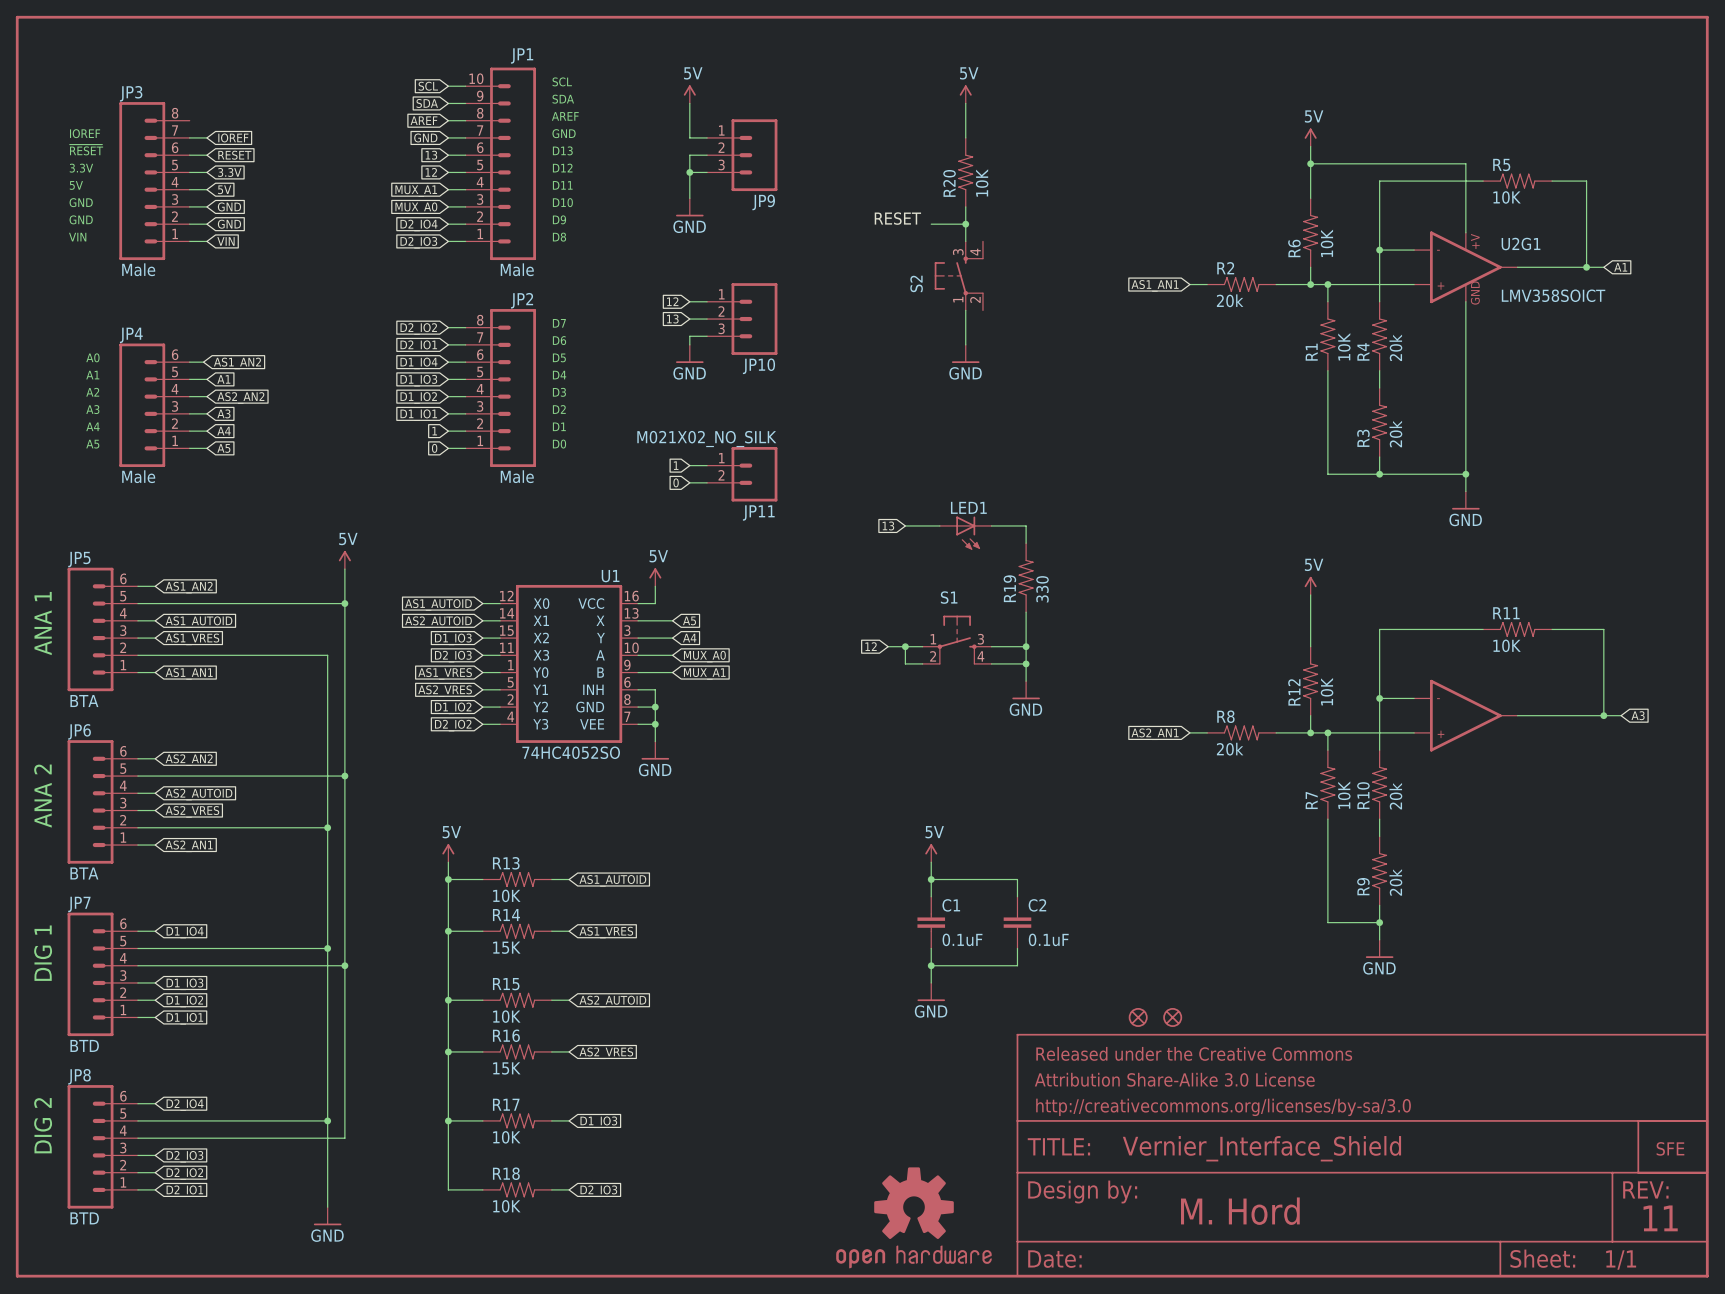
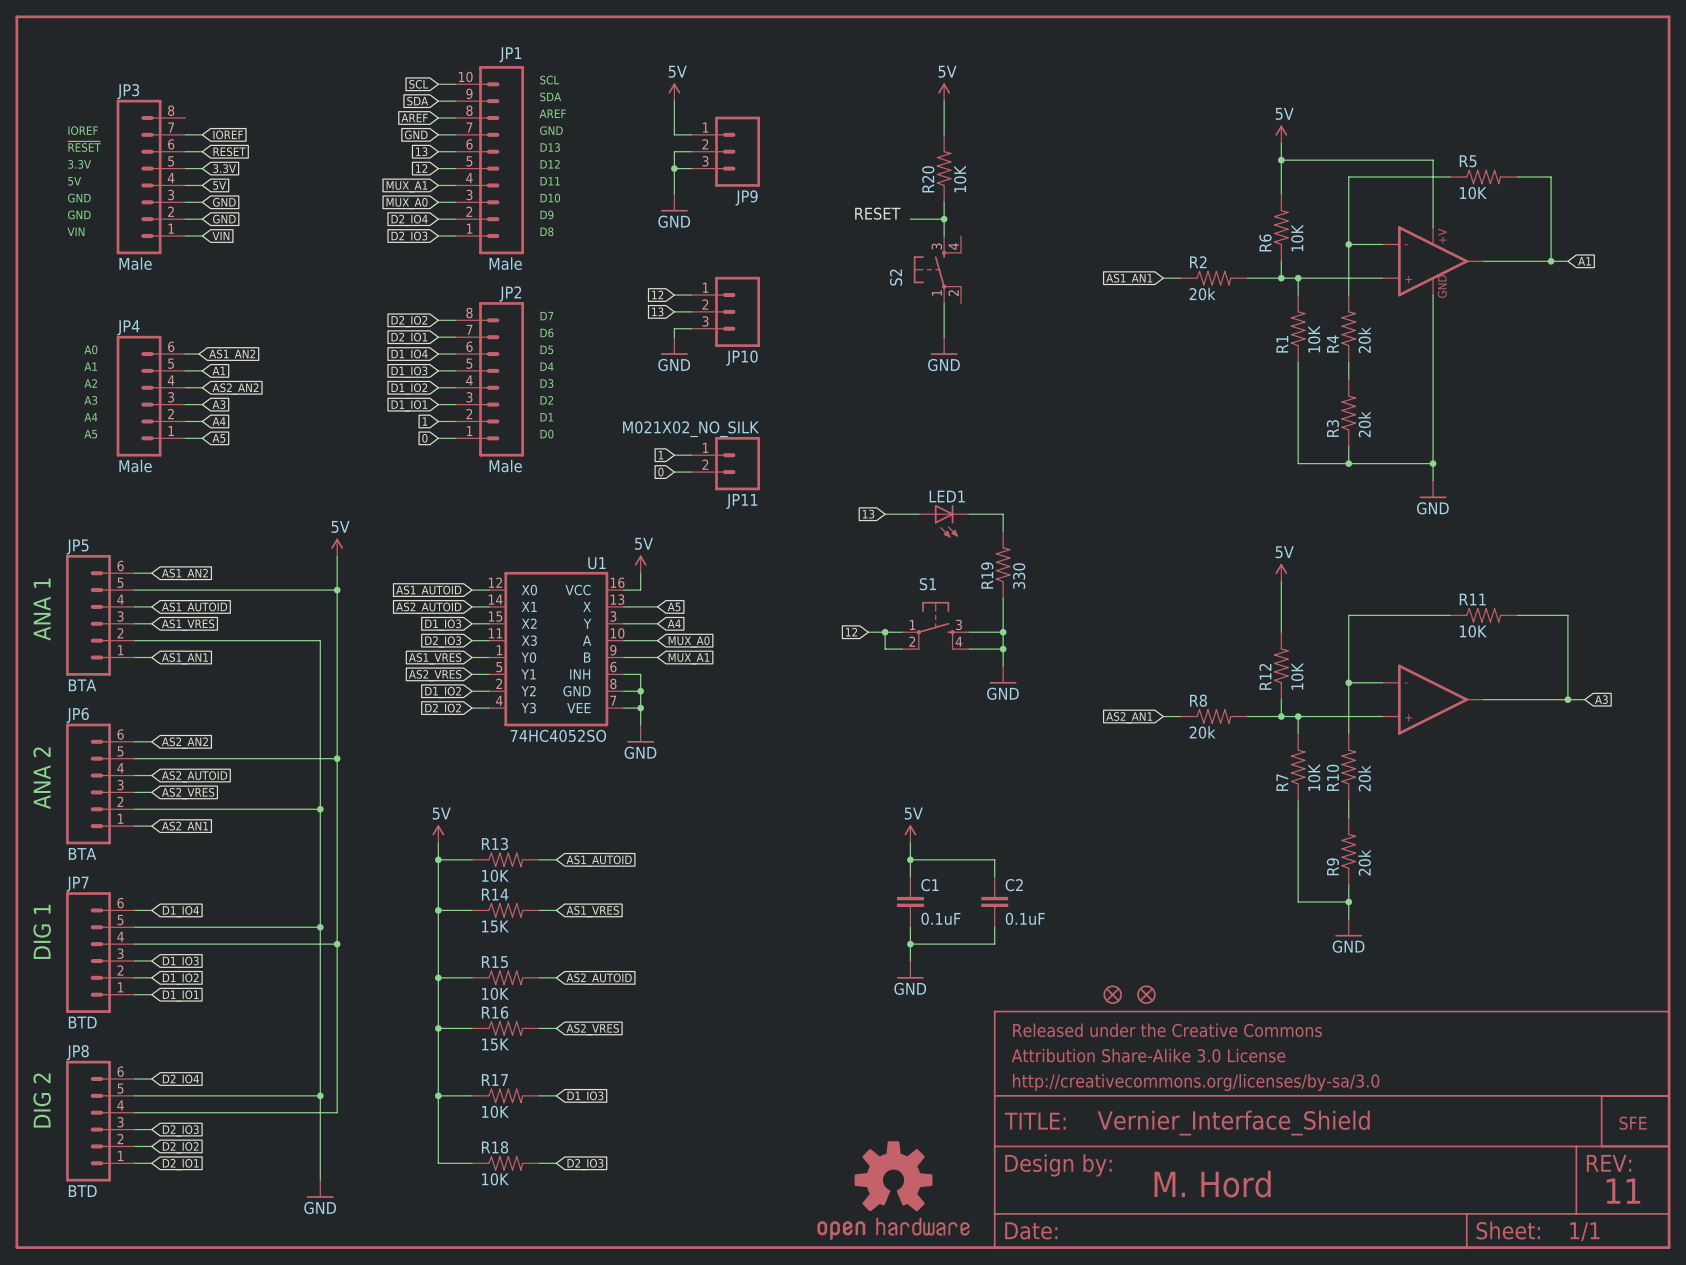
U2G1 name: U2G1 (1521, 244) -> none
U2G1 value: LMV358SOICT (1553, 295) -> none

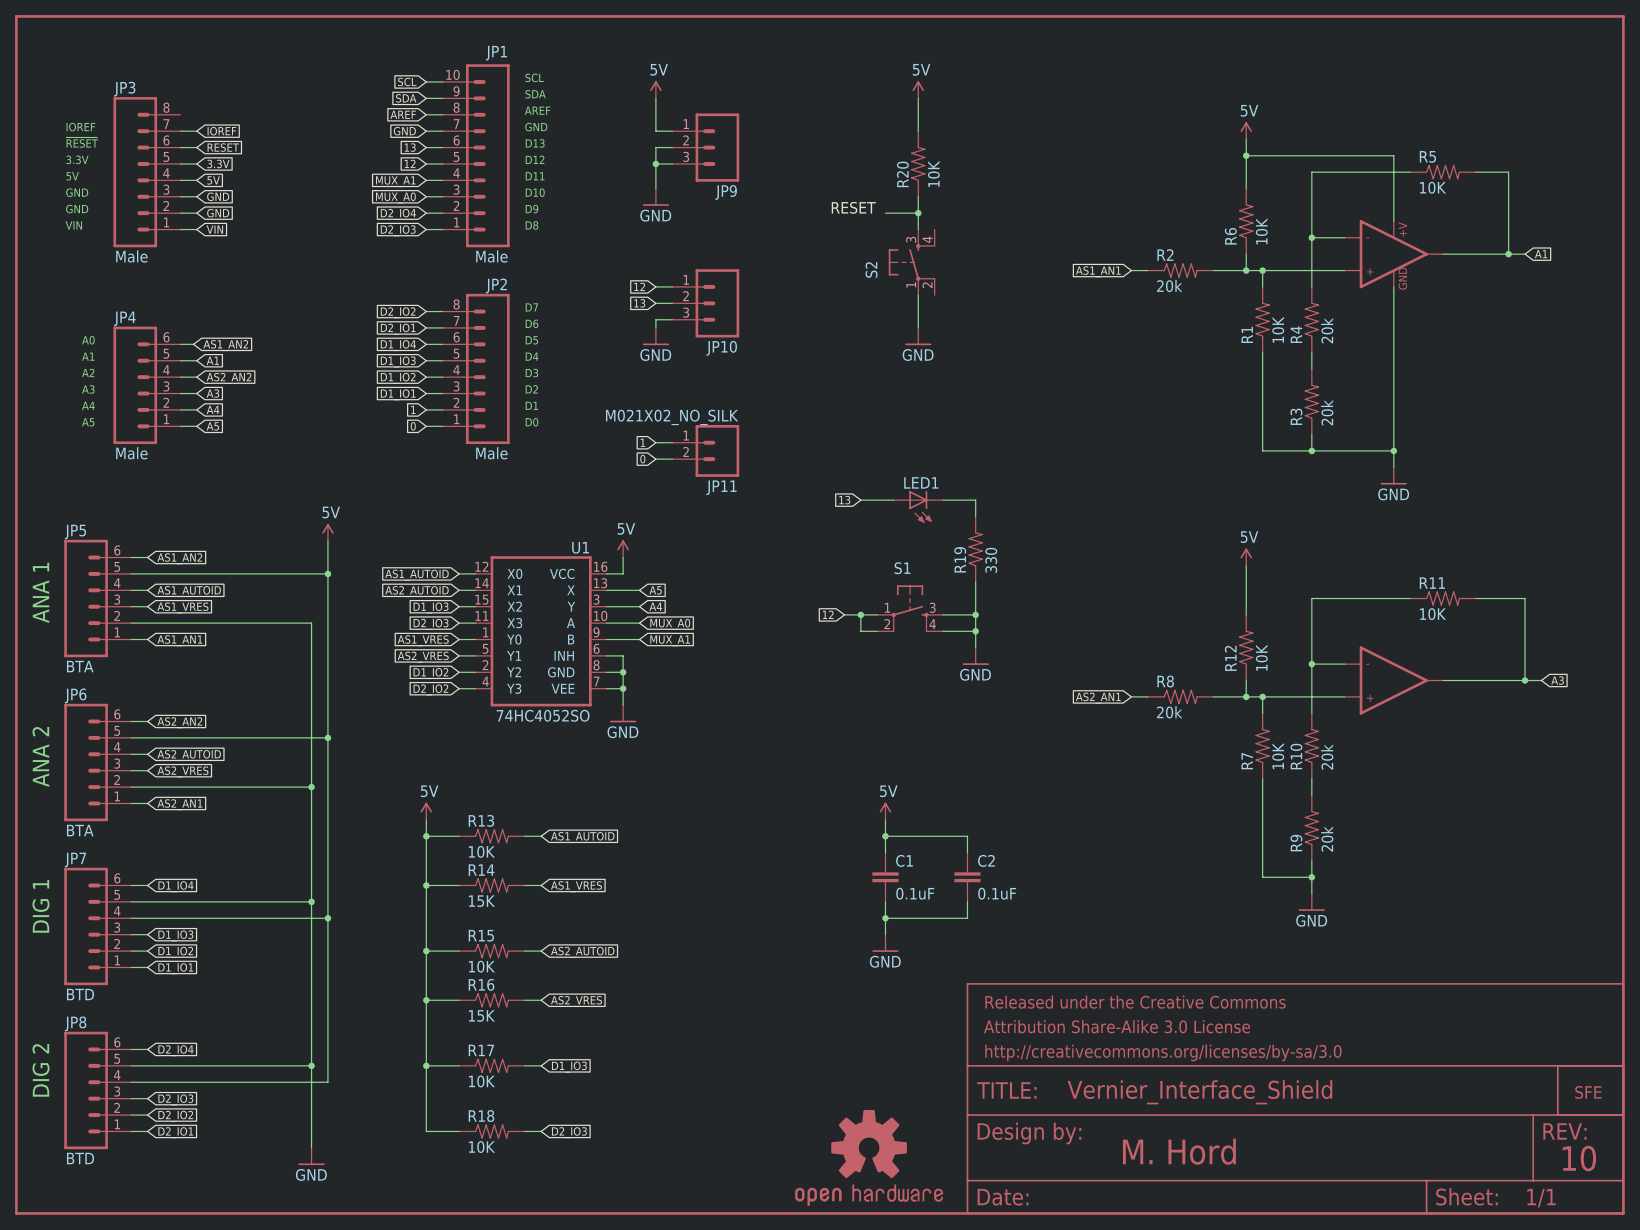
part: (1112, 994) -> none
part: (1146, 994) -> none
text: 11 (1623, 1191) -> 10 (1579, 1158)

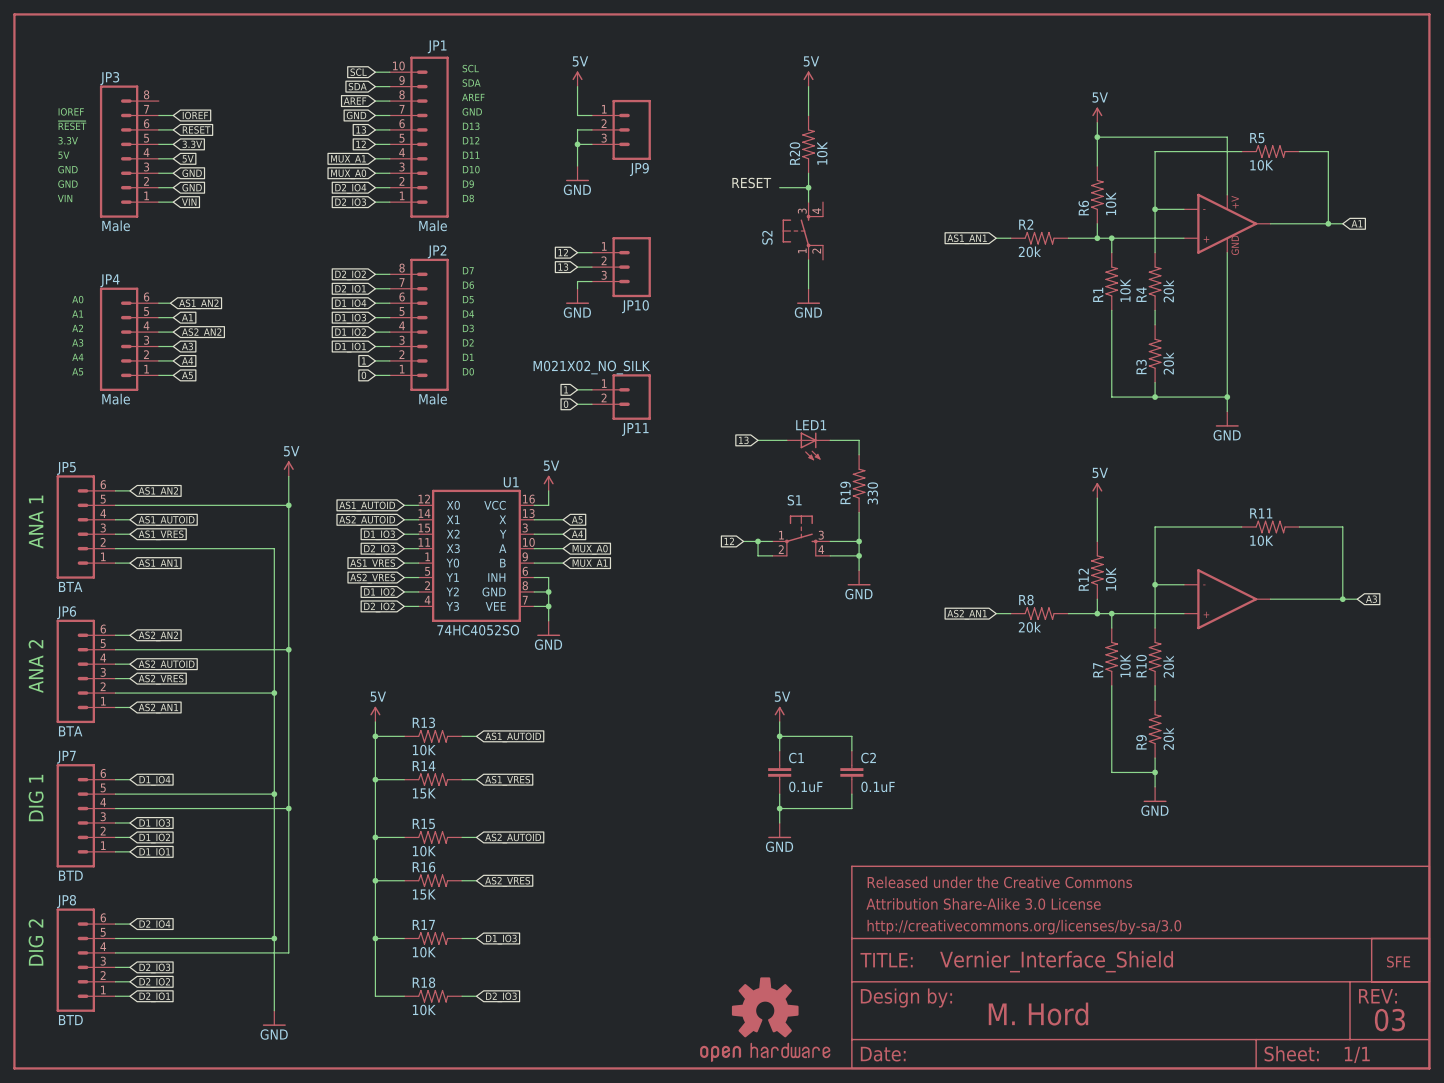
text: 10 (1579, 1158) -> 03 (1389, 1020)

